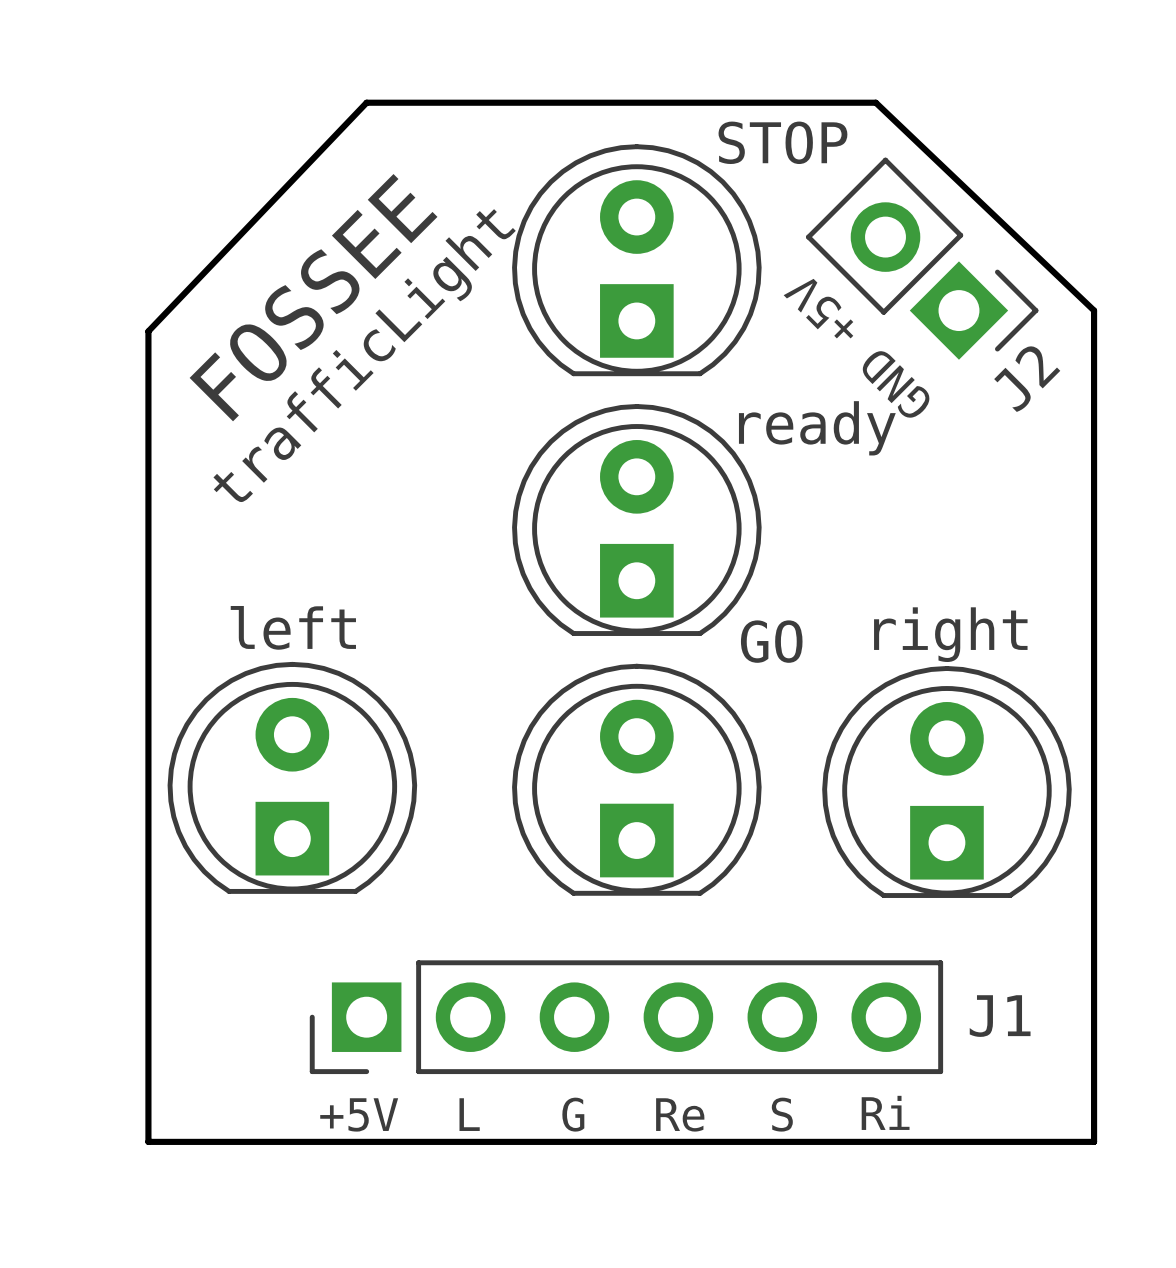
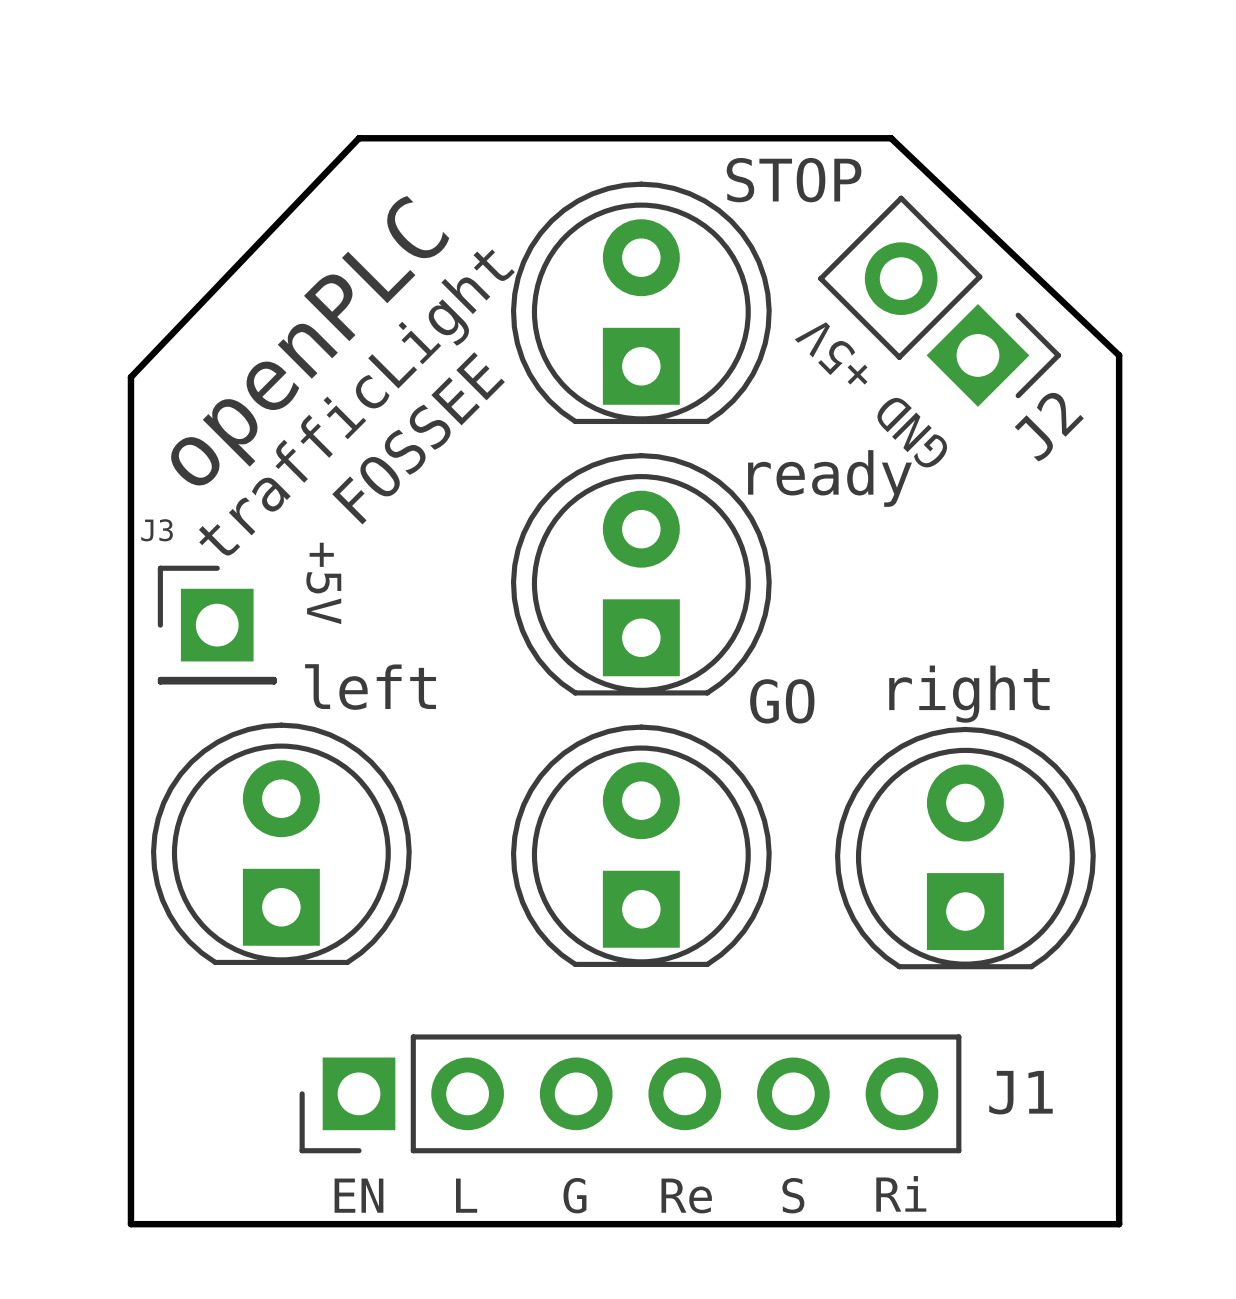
text: FOSSEE (313, 297) -> openPLC (309, 341)
text: none -> FOSSEE (418, 438)
text: none -> +5V (323, 583)
J3: none -> (217, 625)
part value position: left (293, 627) -> left (370, 687)
text: +5V (359, 1114) -> EN (358, 1195)

